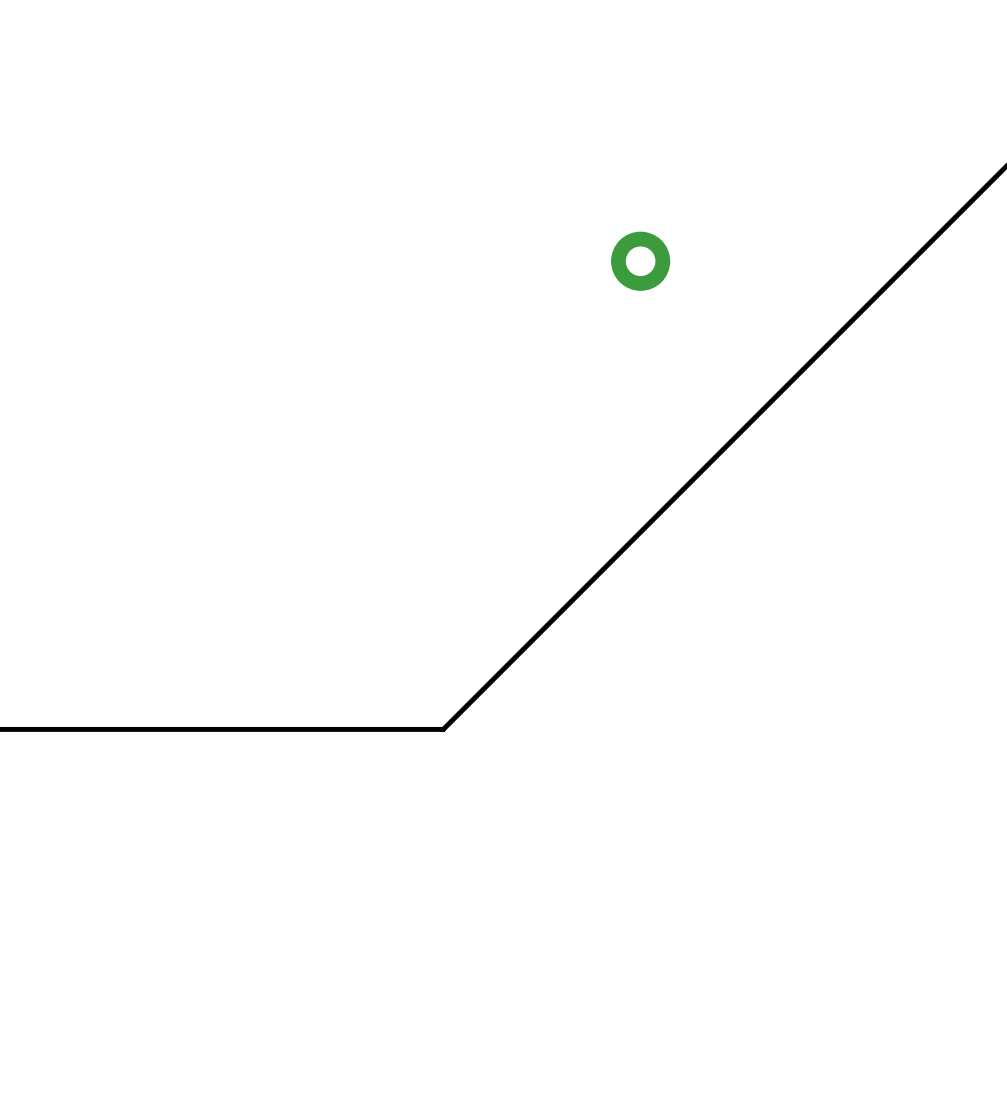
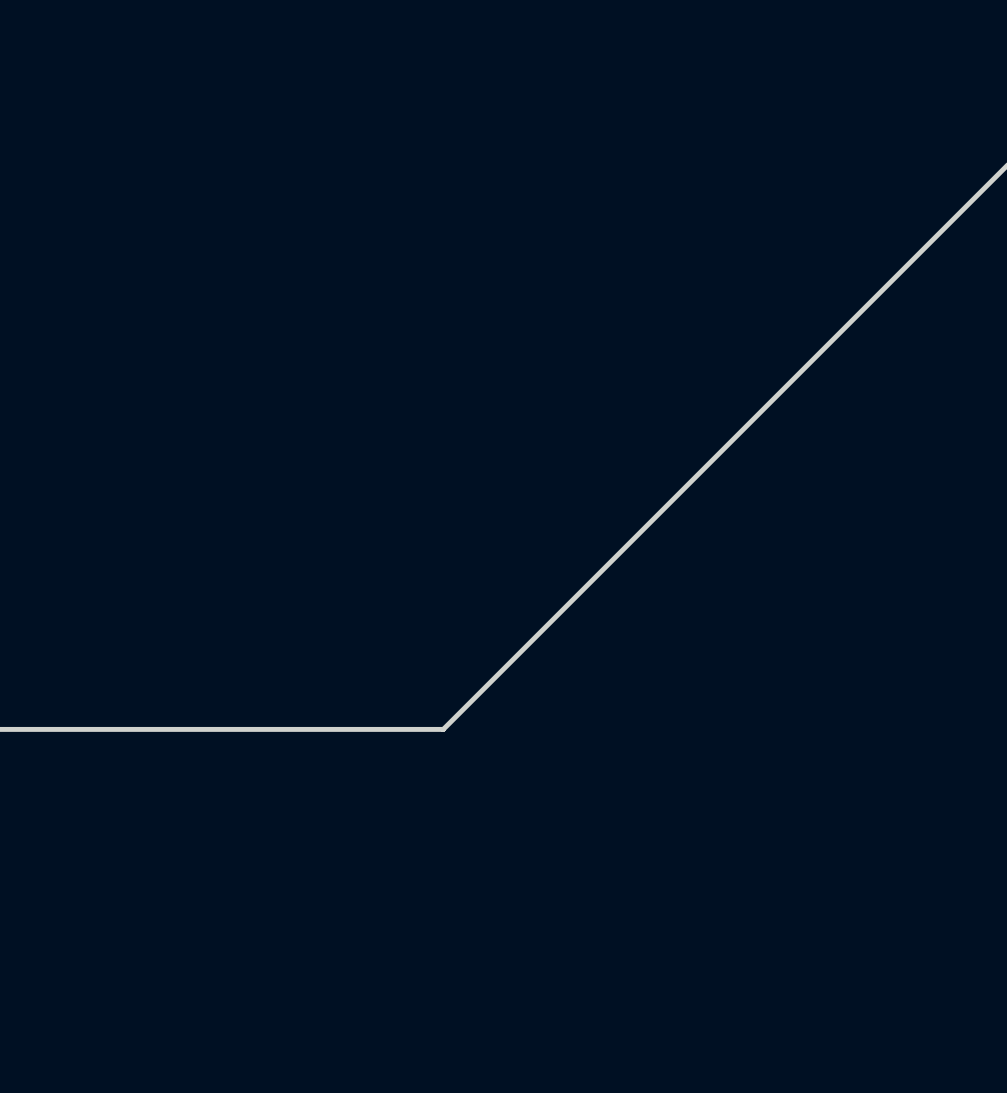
via: (640, 261) -> none

